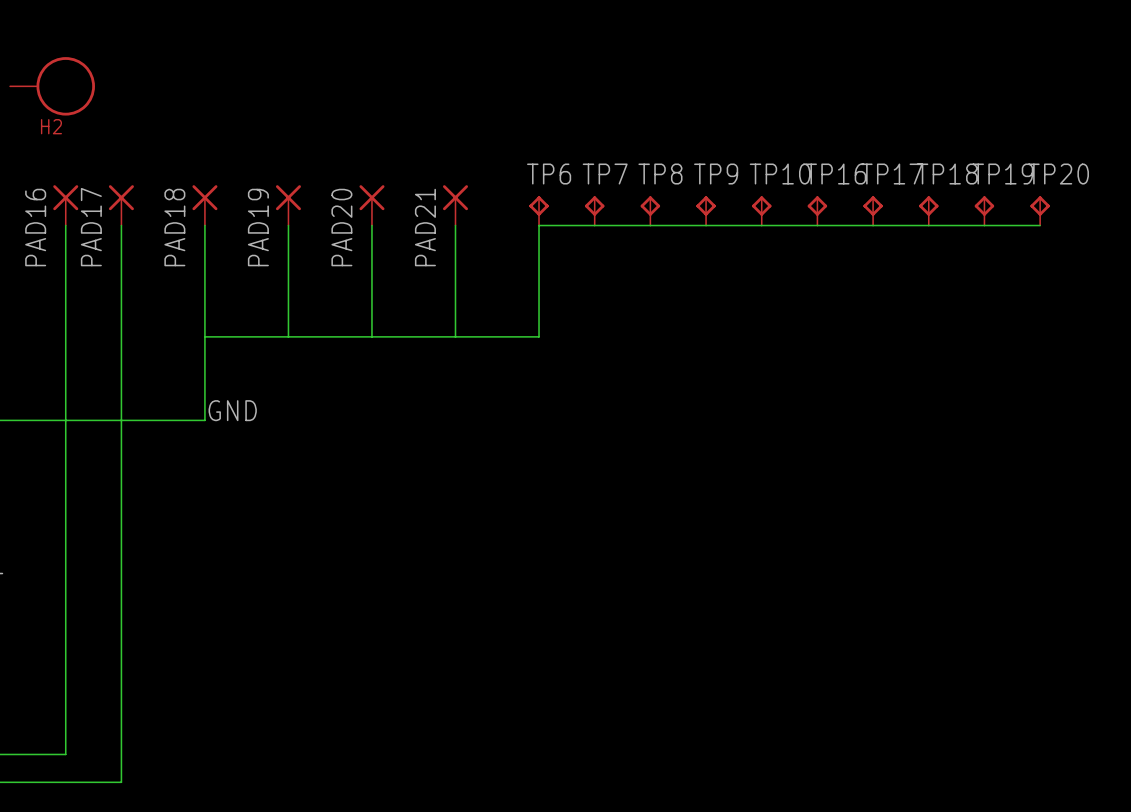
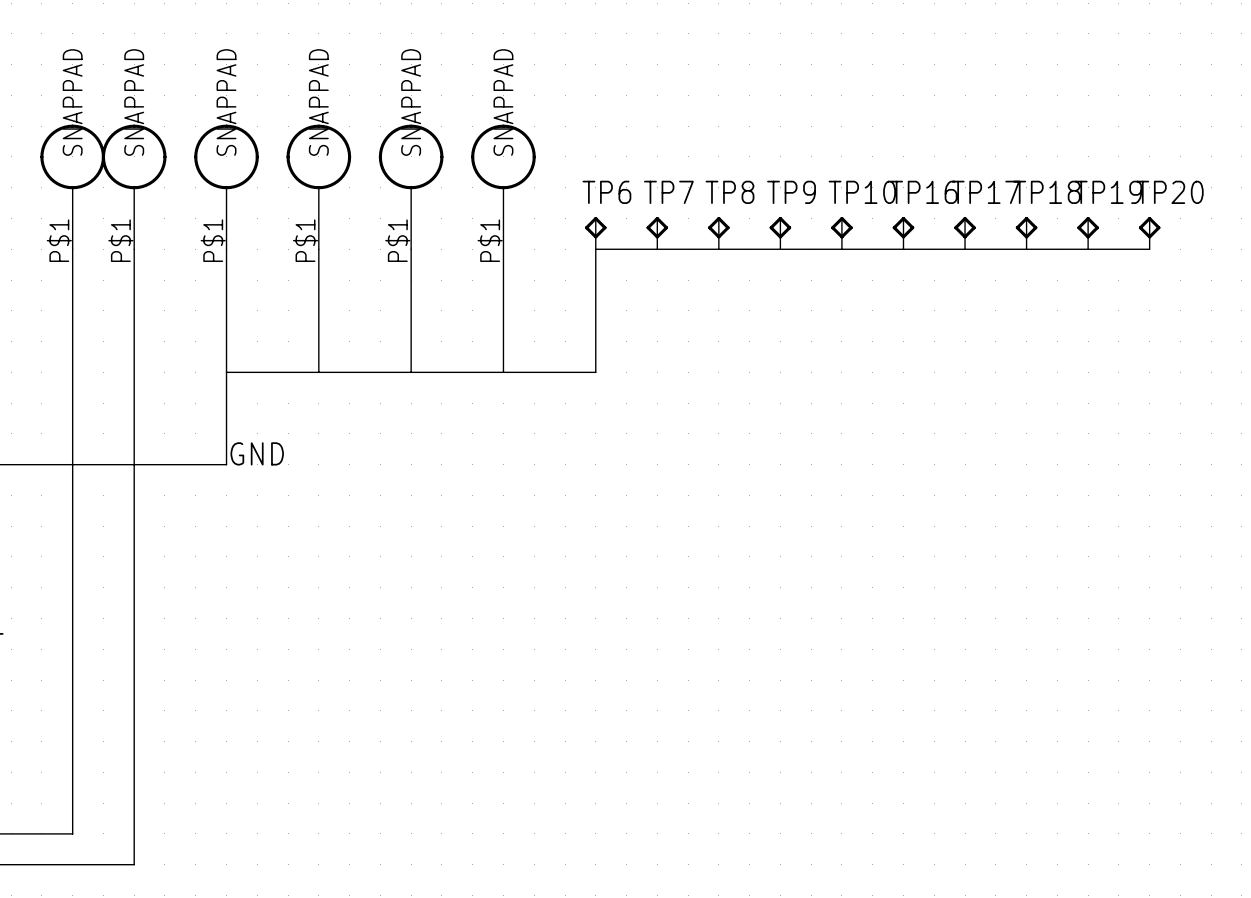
H2: (52, 86) -> none
part: none -> (72, 186)
part: none -> (134, 186)
part: none -> (226, 186)
part: none -> (318, 186)
part: none -> (411, 186)
part: none -> (503, 186)
PAD16: (65, 205) -> none
PAD17: (121, 205) -> none
PAD18: (204, 205) -> none
PAD19: (288, 205) -> none
PAD20: (371, 205) -> none
PAD21: (455, 205) -> none

